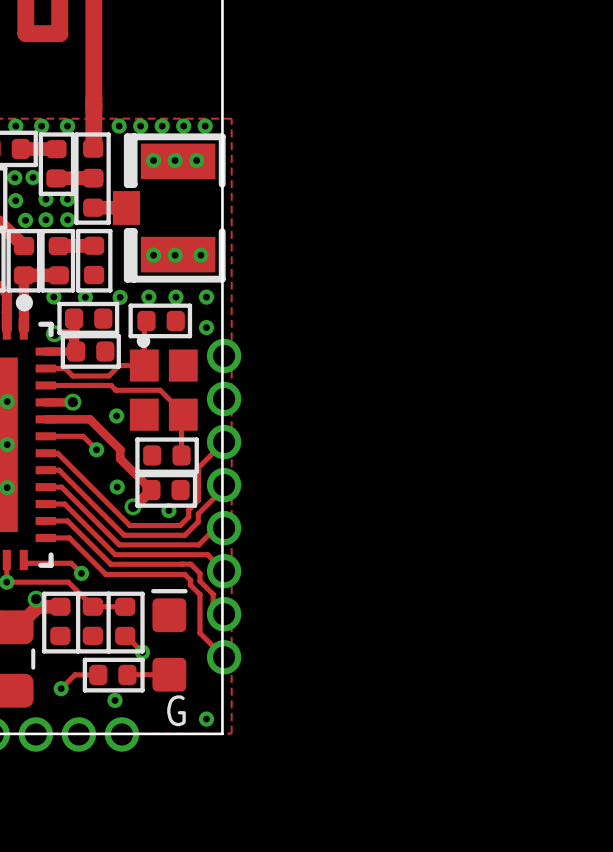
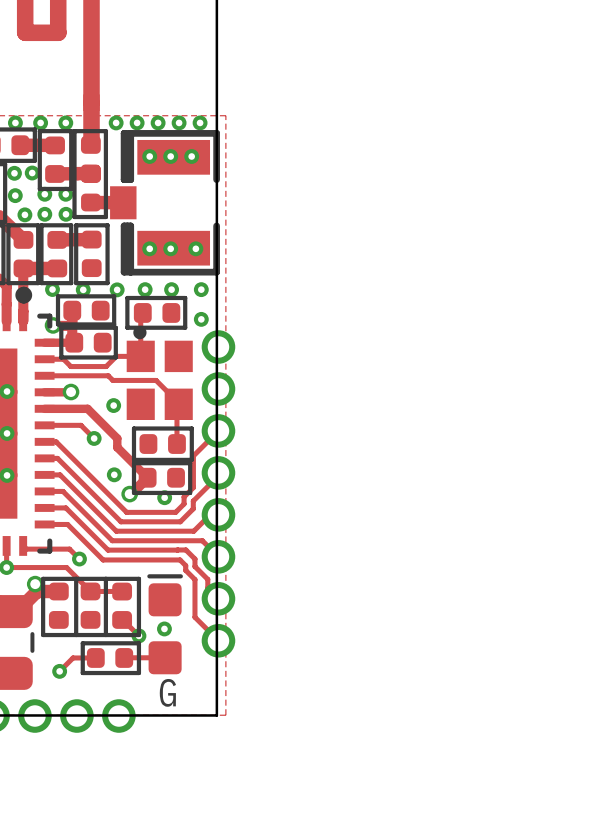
via: none -> (164, 628)
via: (114, 700) -> none
via: (206, 719) -> none

